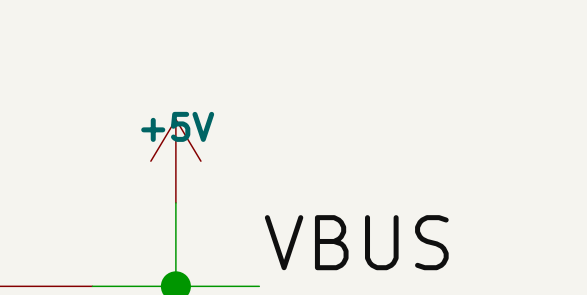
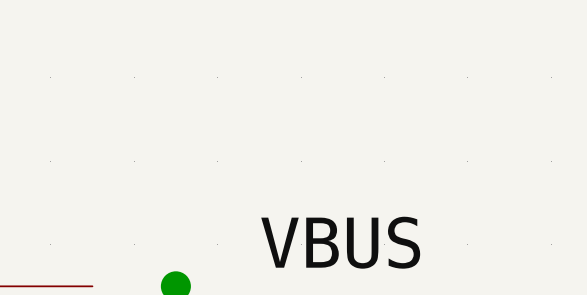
power symbol: +5V (175, 161) -> none
wire: (175, 202) (175, 286) -> none
wire: (92, 286) (259, 286) -> none

